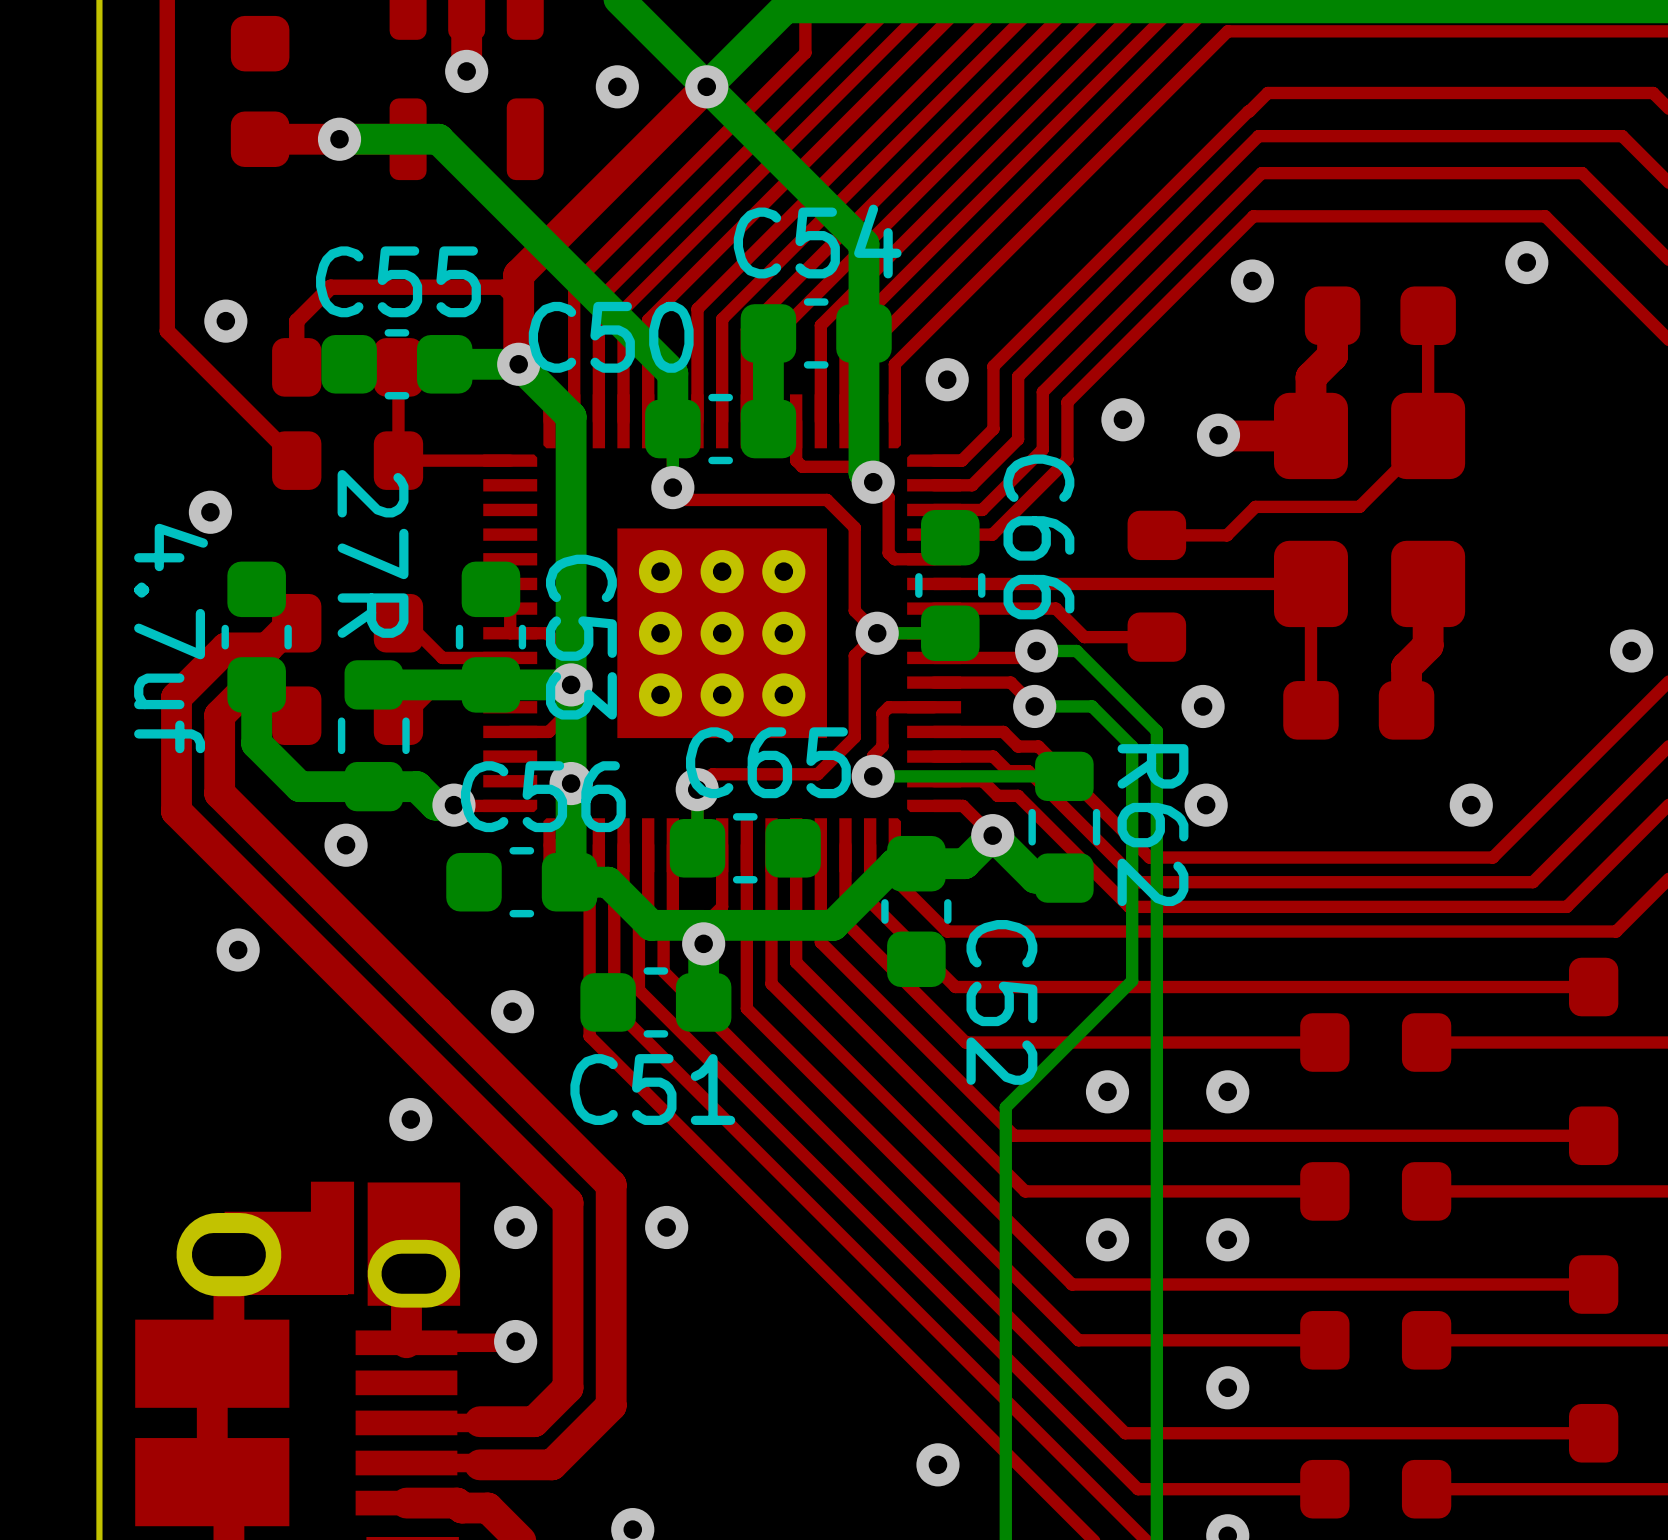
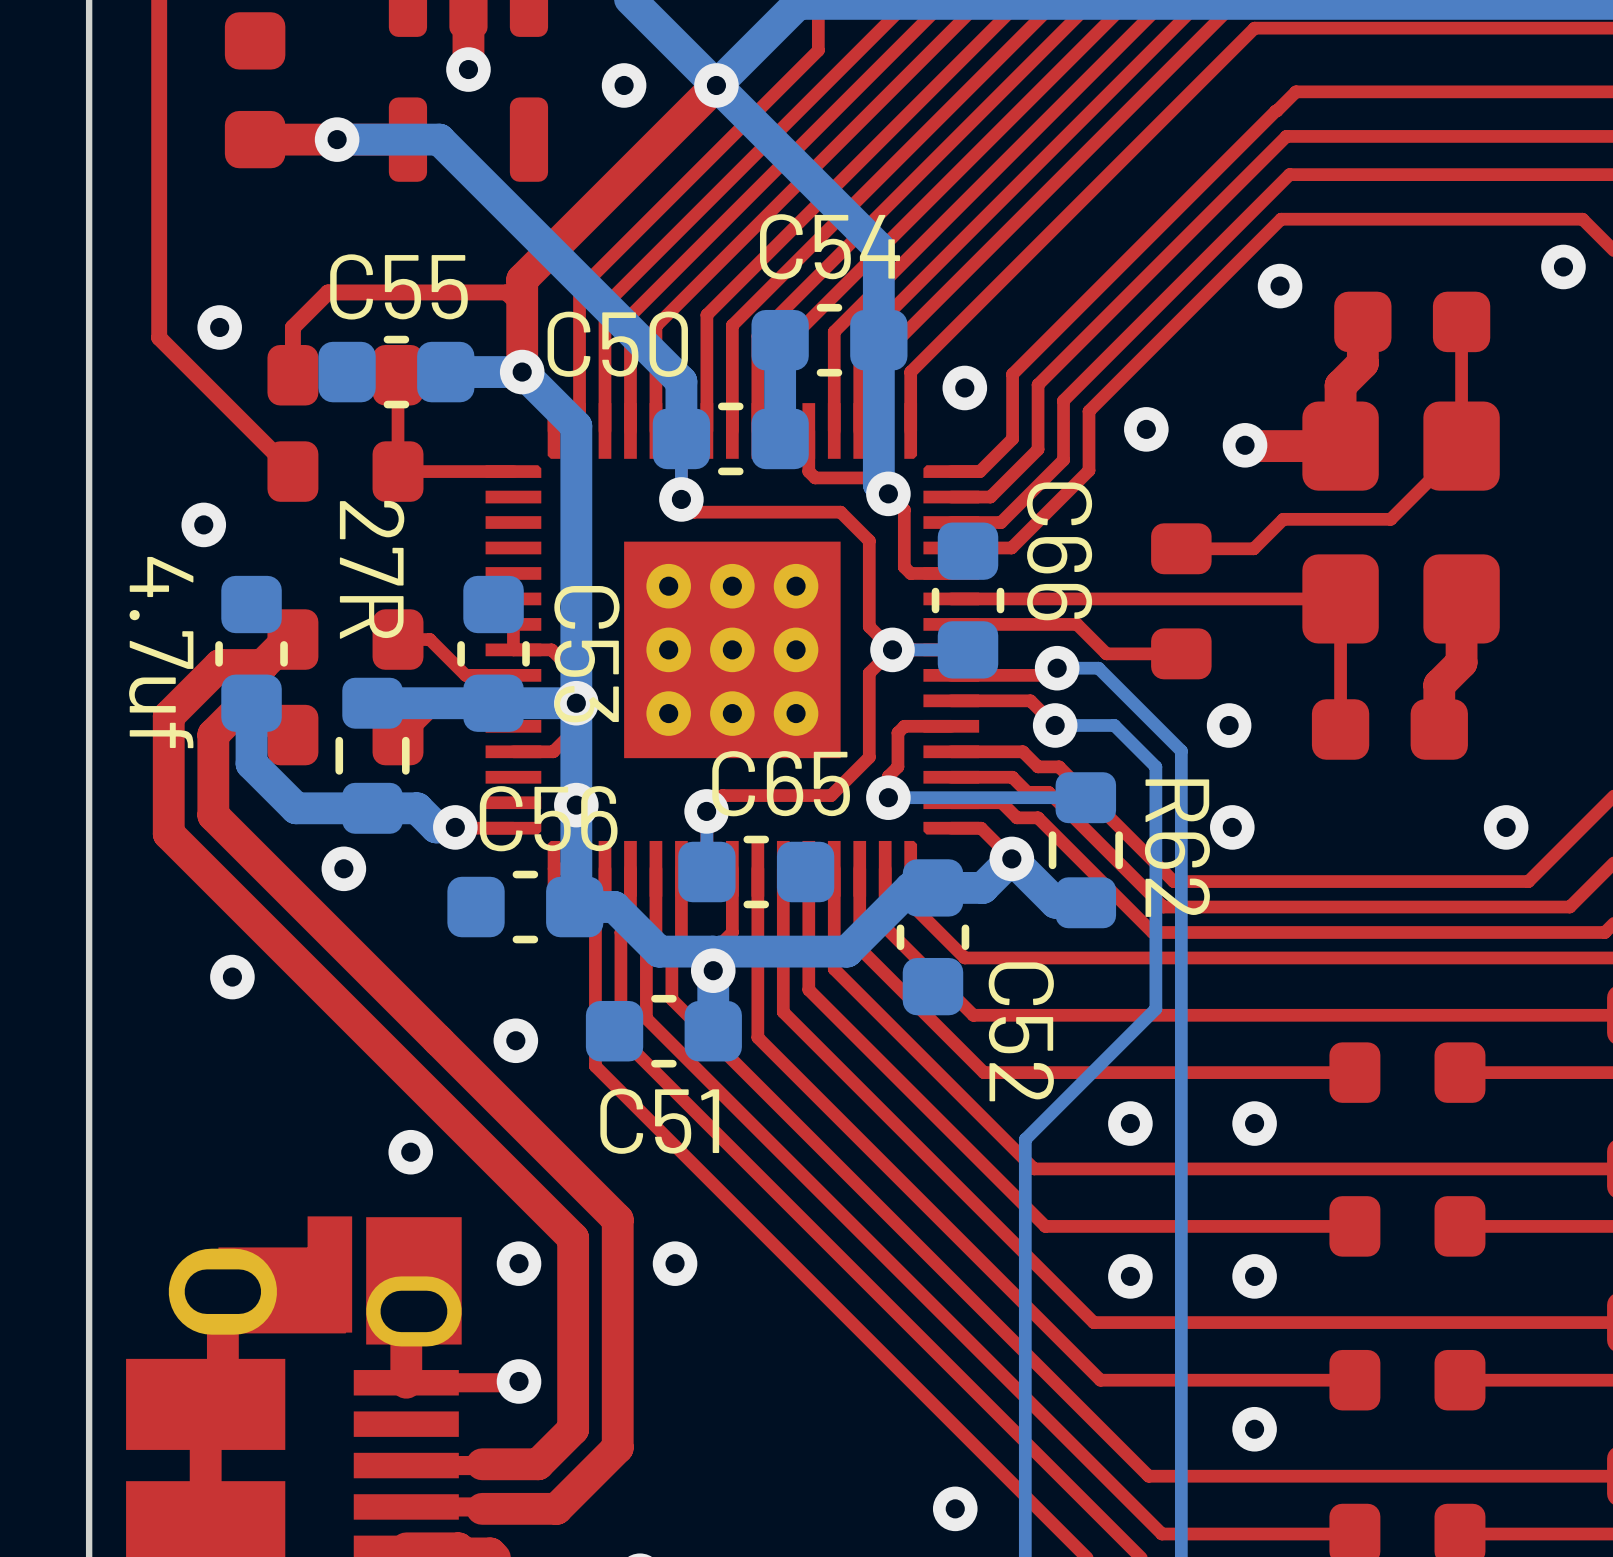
top track: (407, 623) (442, 657) (463, 657) -> (407, 639) (429, 639) (465, 675)

